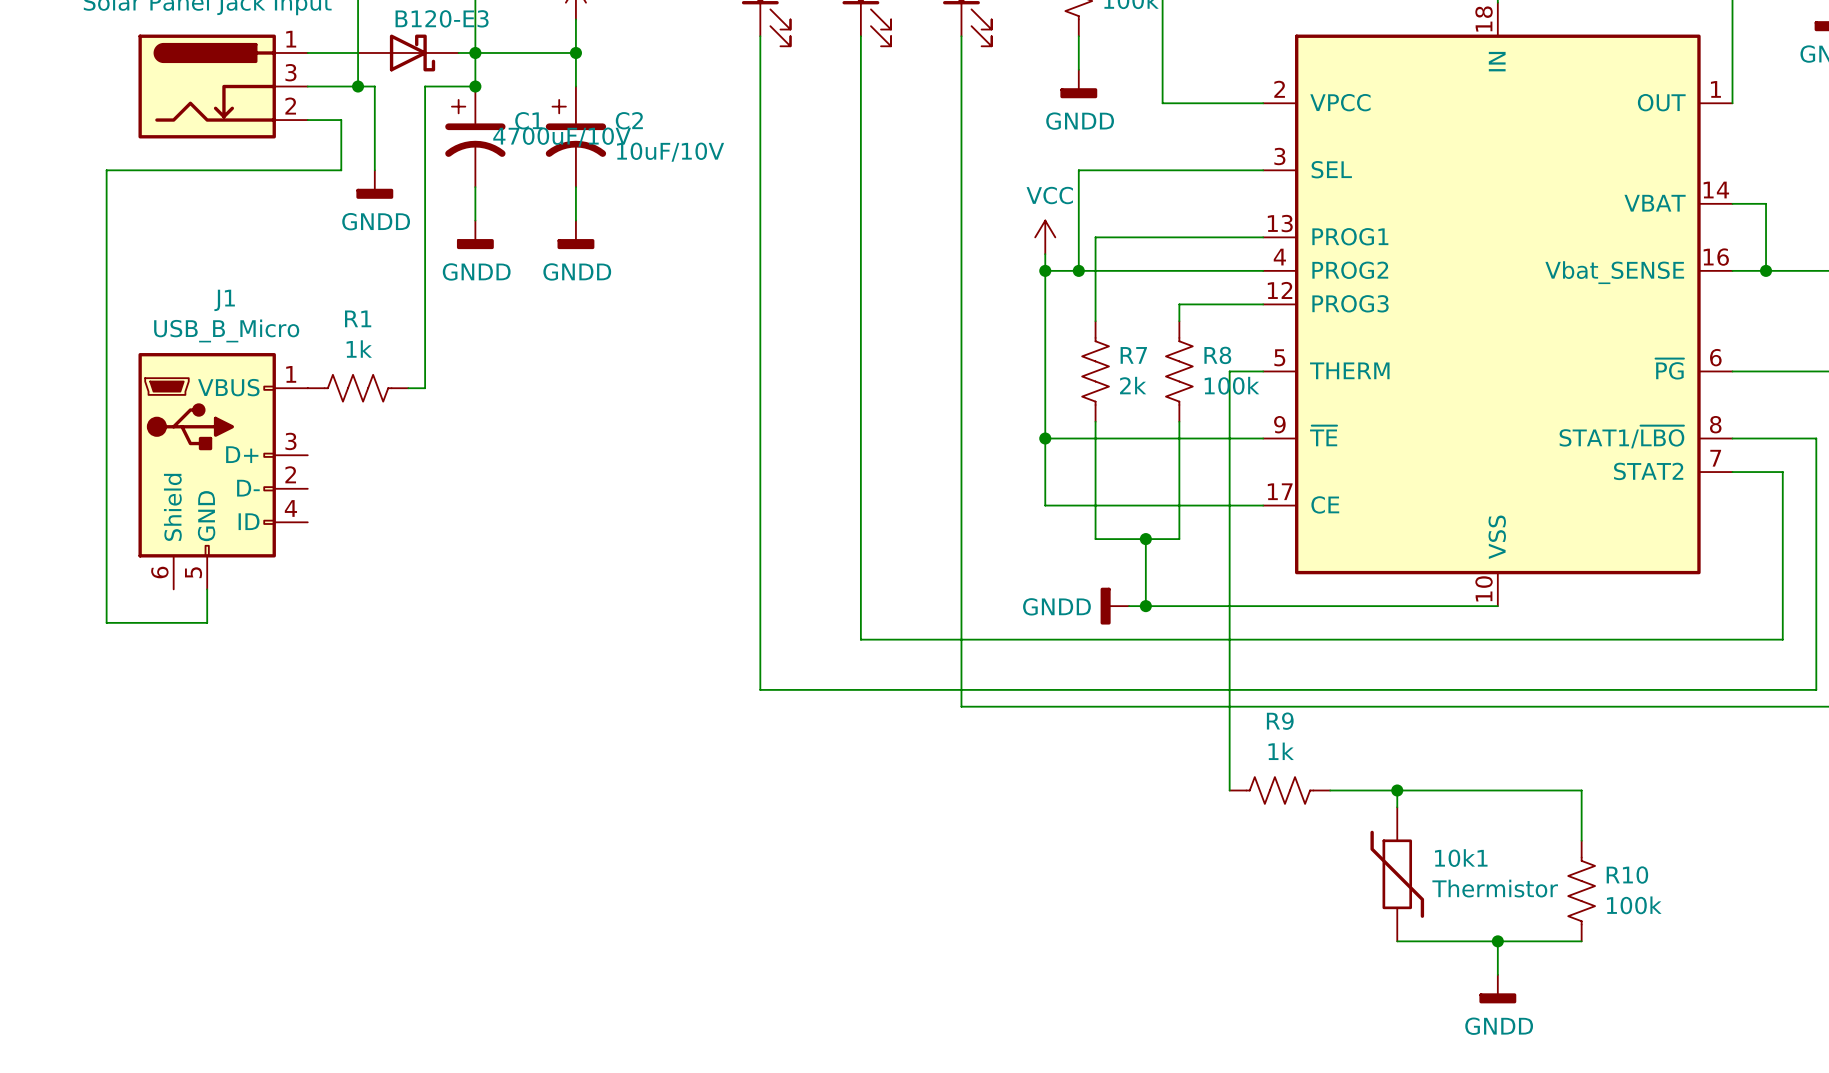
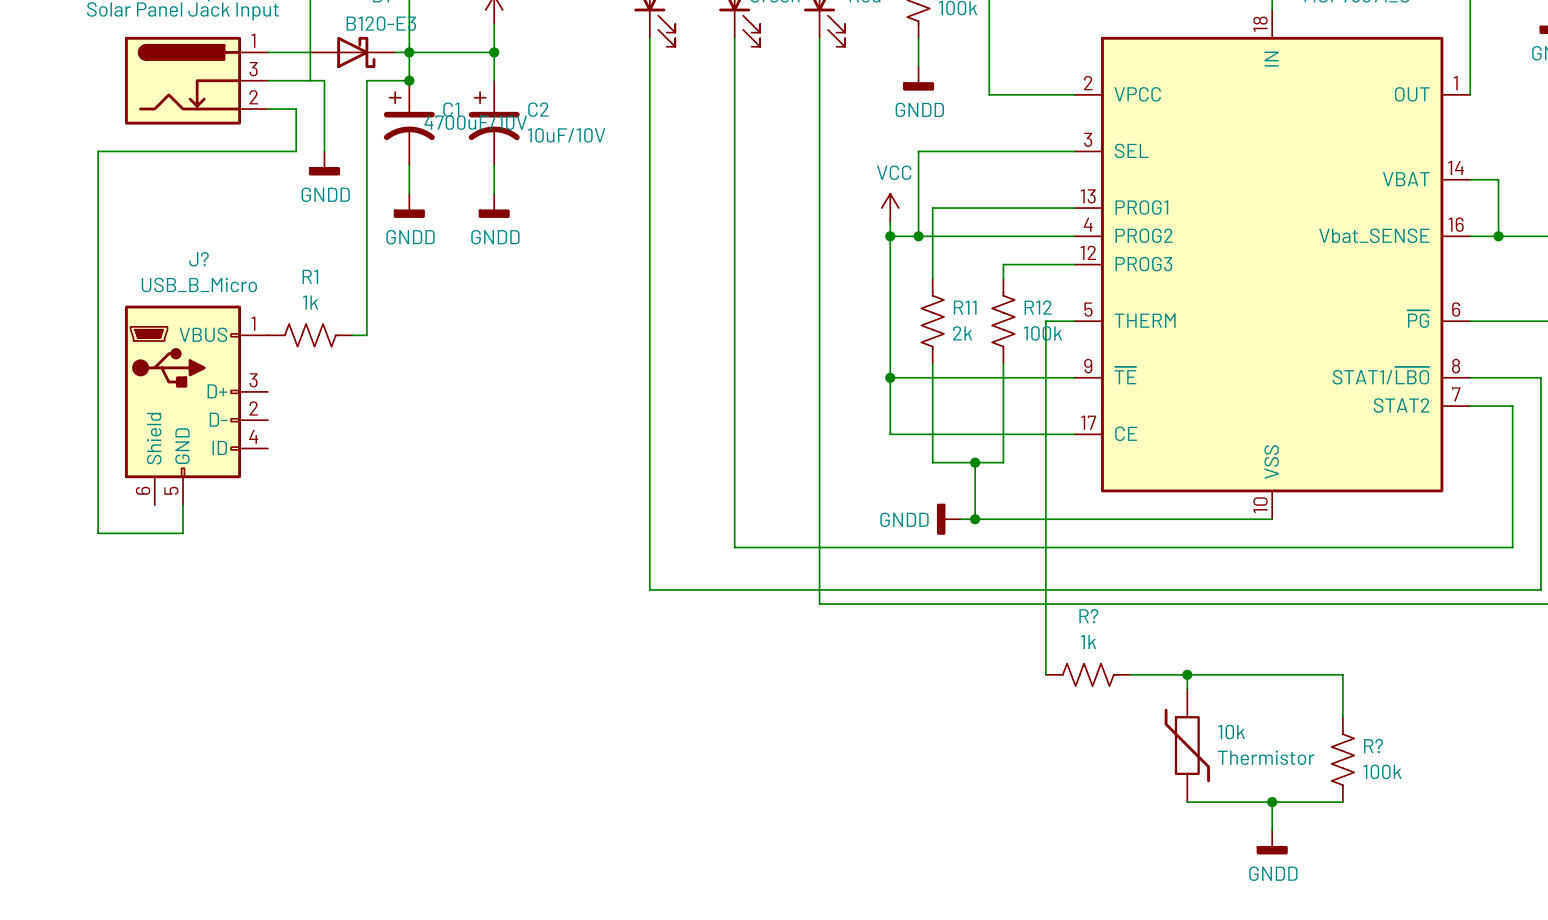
junction: (358, 86) -> none
J1 name: J1 (224, 300) -> J? (199, 259)
R7 name: R7 (1133, 355) -> R11 (965, 307)
R8 name: R8 (1217, 355) -> R12 (1038, 307)
R9 name: R9 (1280, 721) -> R? (1088, 616)
10k1 name: 10k1 (1461, 858) -> 10k (1231, 732)
R10 name: R10 (1627, 875) -> R? (1373, 746)

